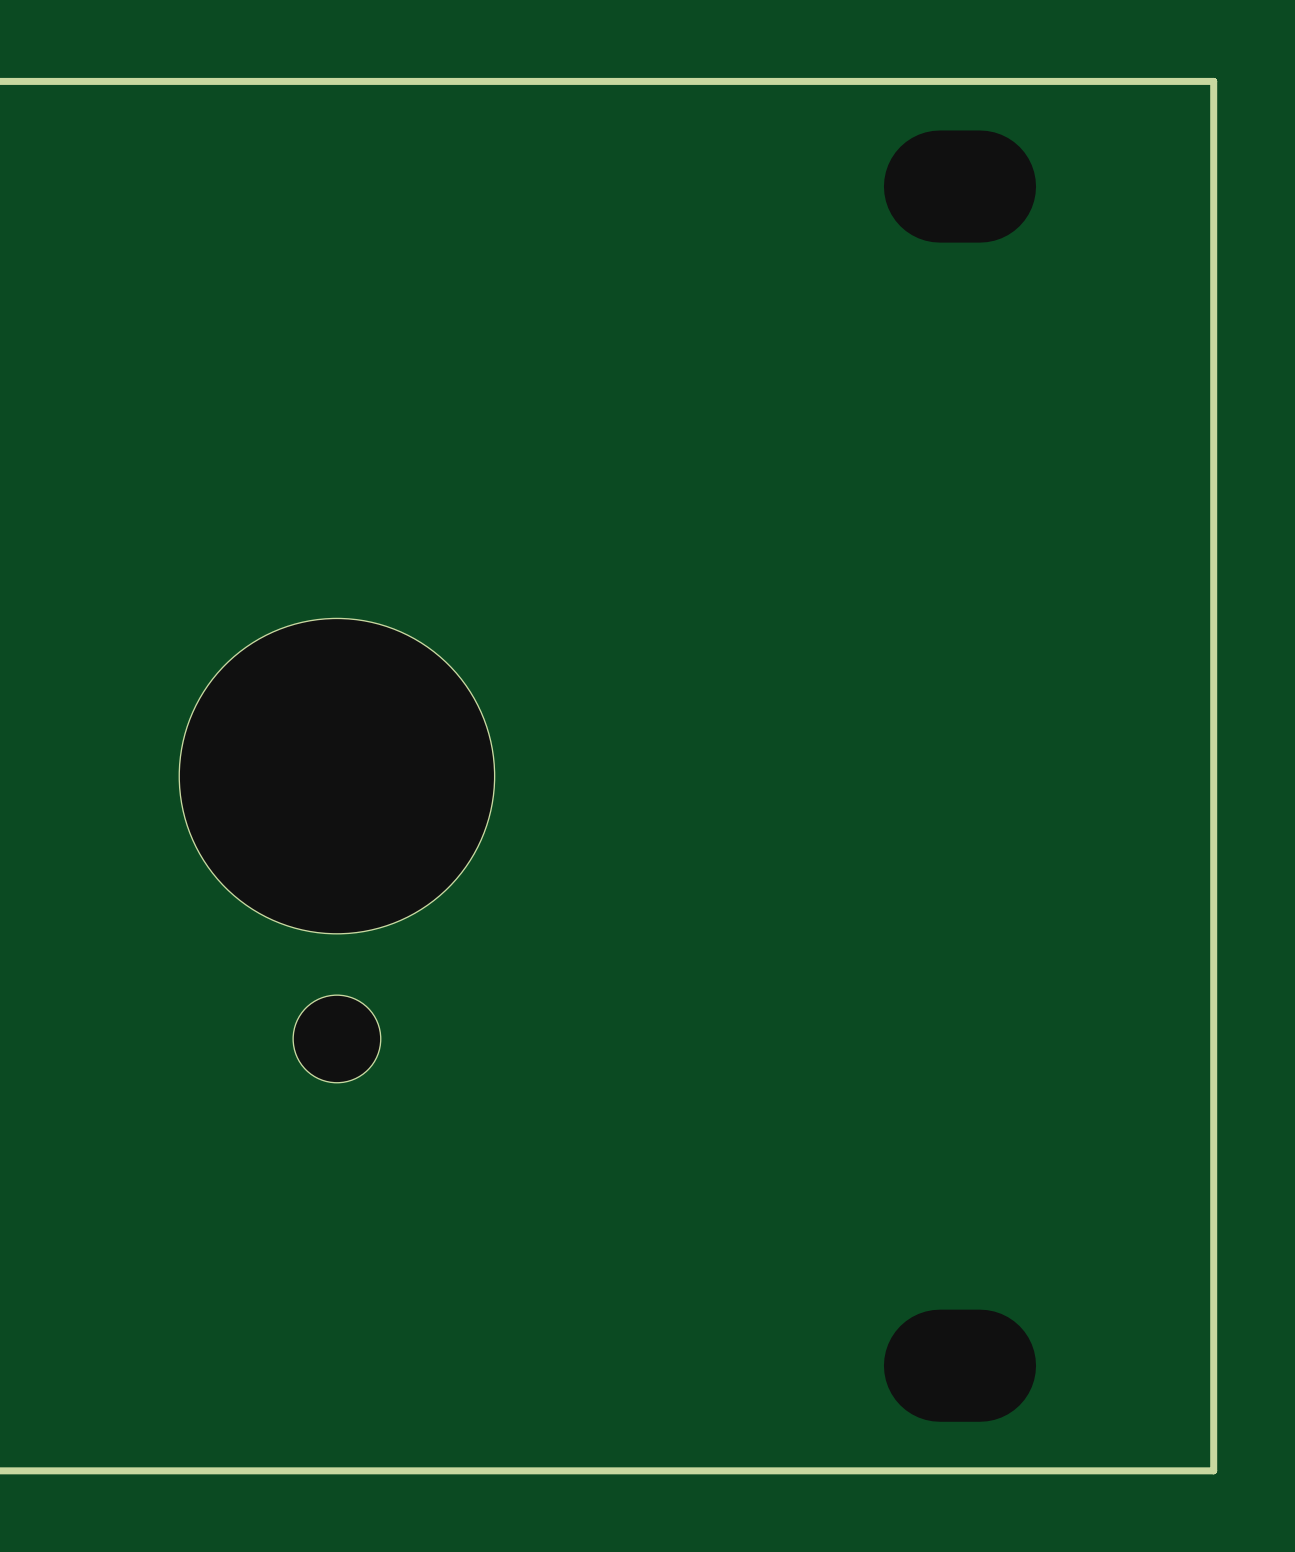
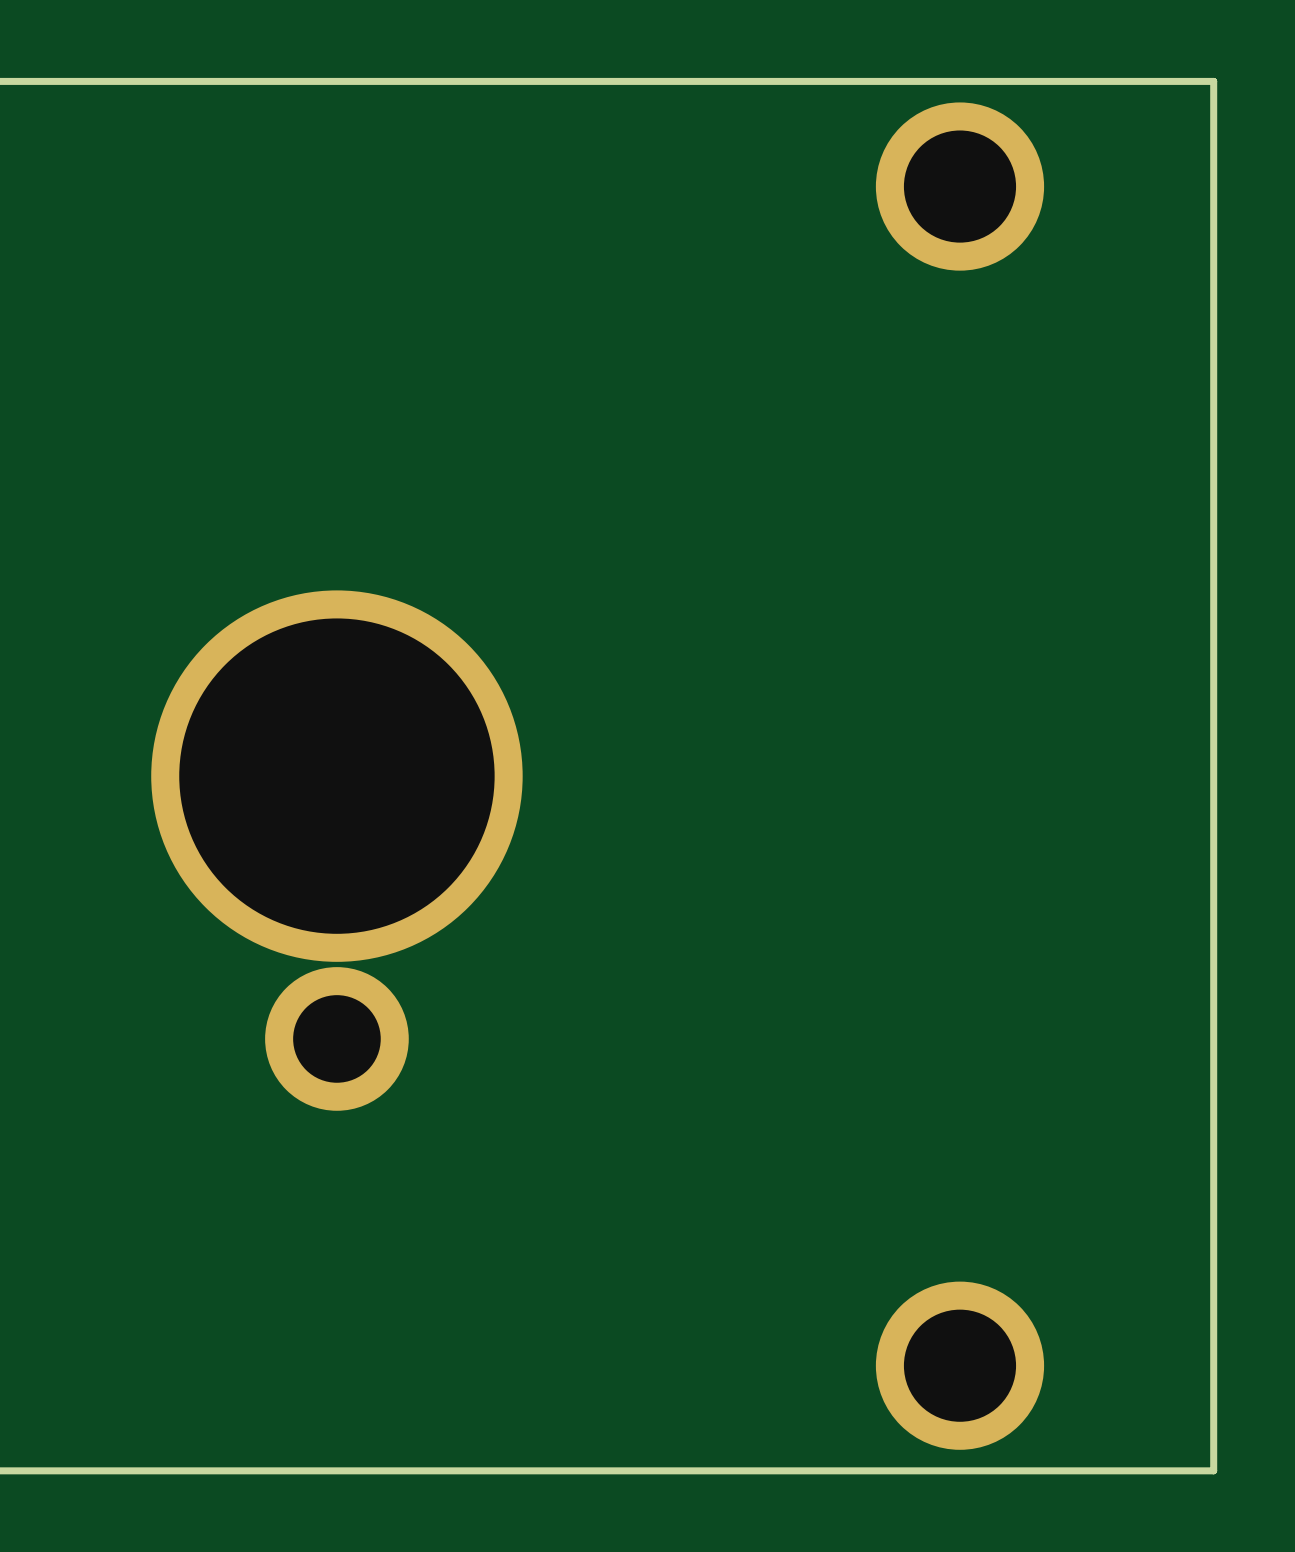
part footprint: [883, 130, 1037, 243] -> [875, 102, 1045, 271]
part footprint: [179, 618, 495, 1083] -> [151, 590, 523, 1111]
part footprint: [883, 1309, 1037, 1422] -> [875, 1281, 1045, 1450]

